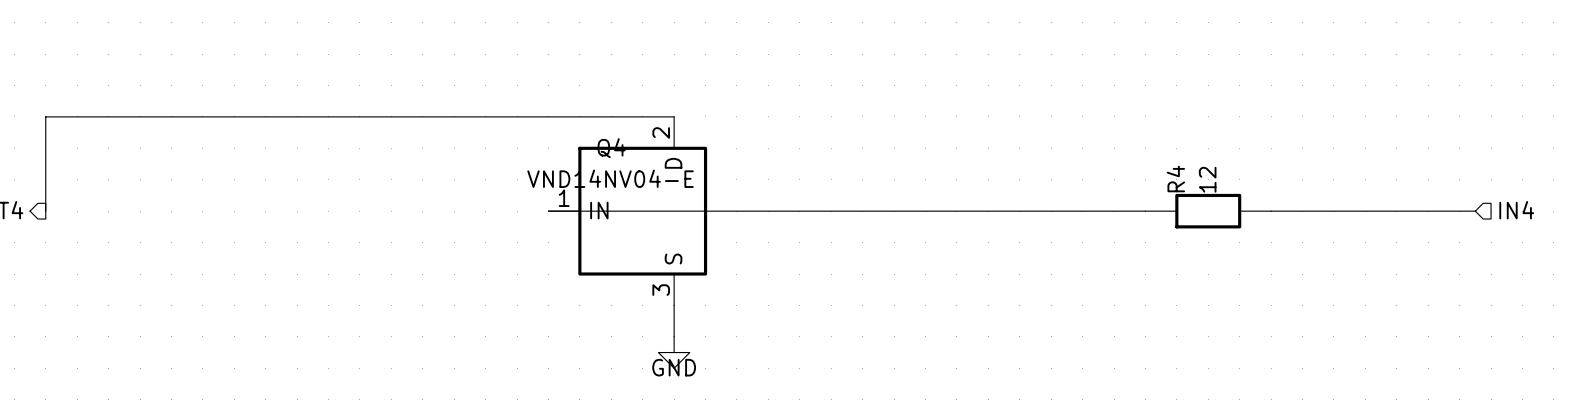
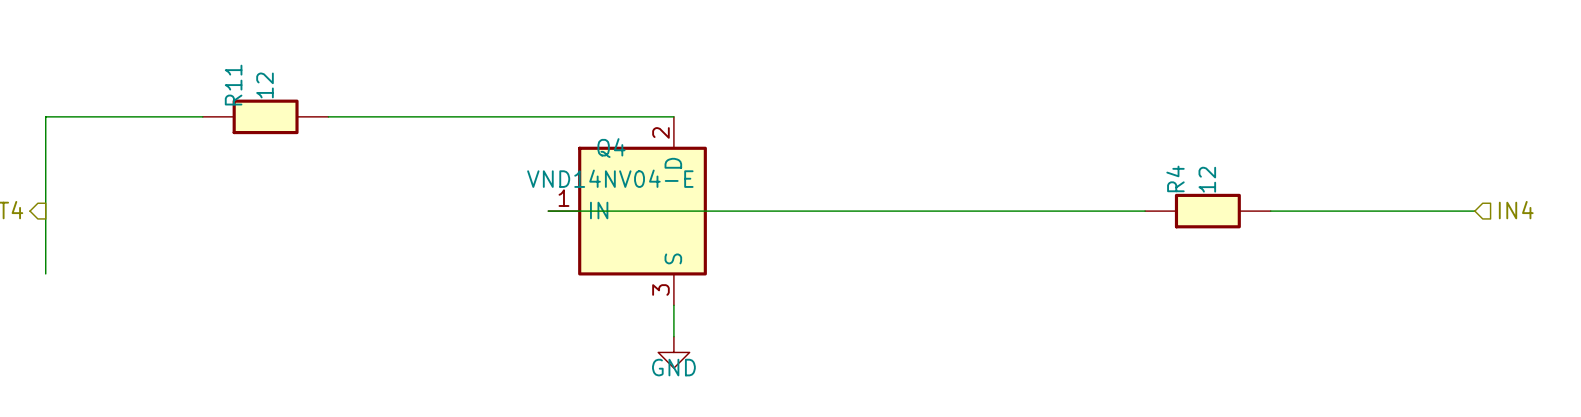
R11: none -> 12 (265, 116)
wire: none -> (45, 211) (45, 273)

